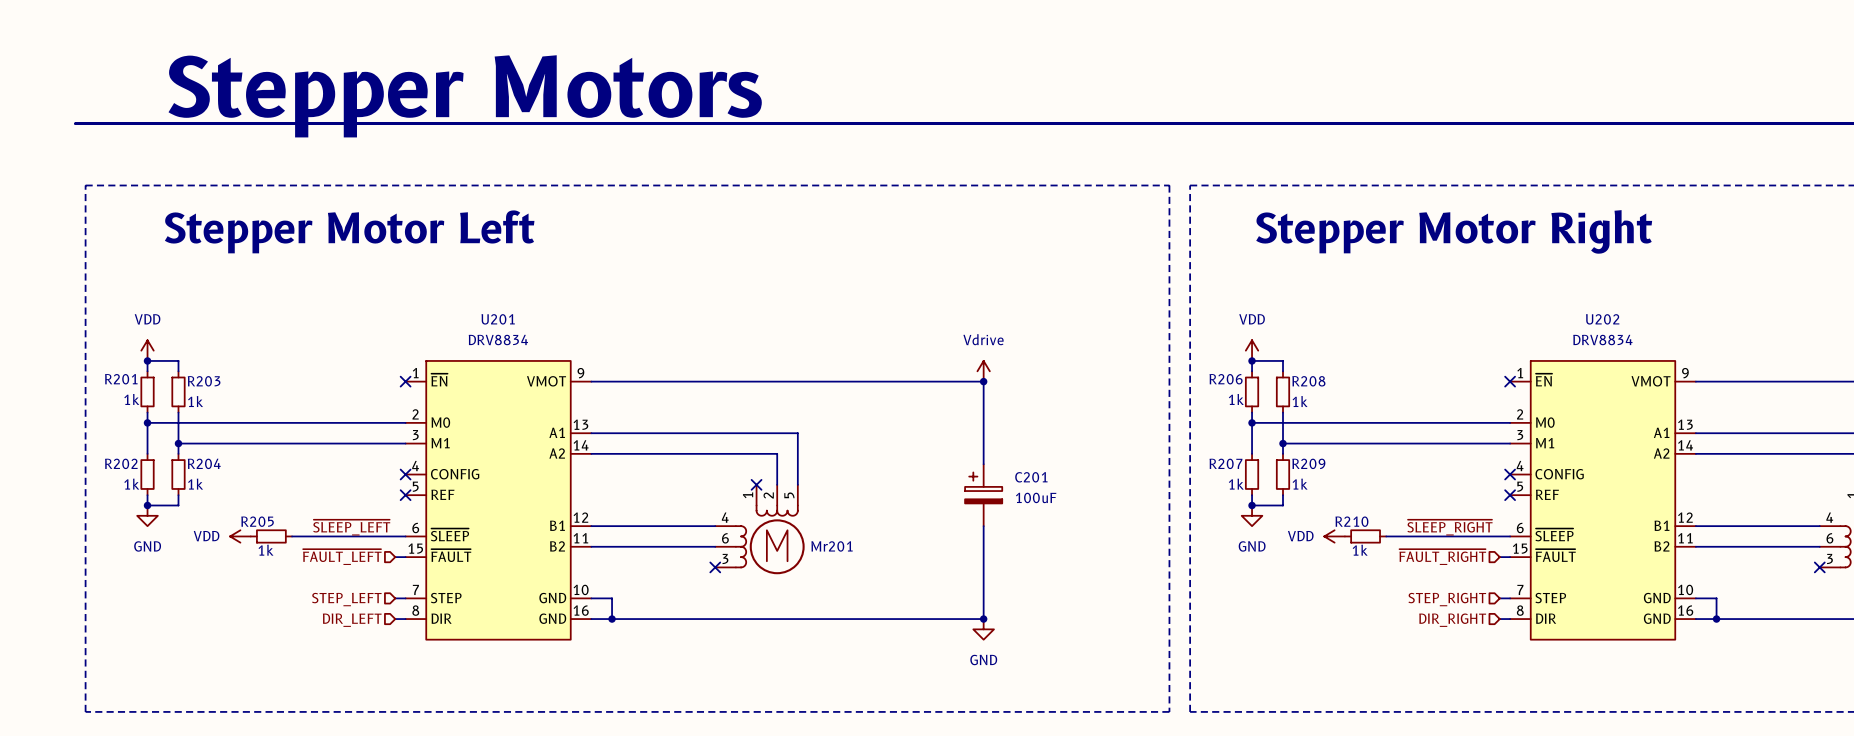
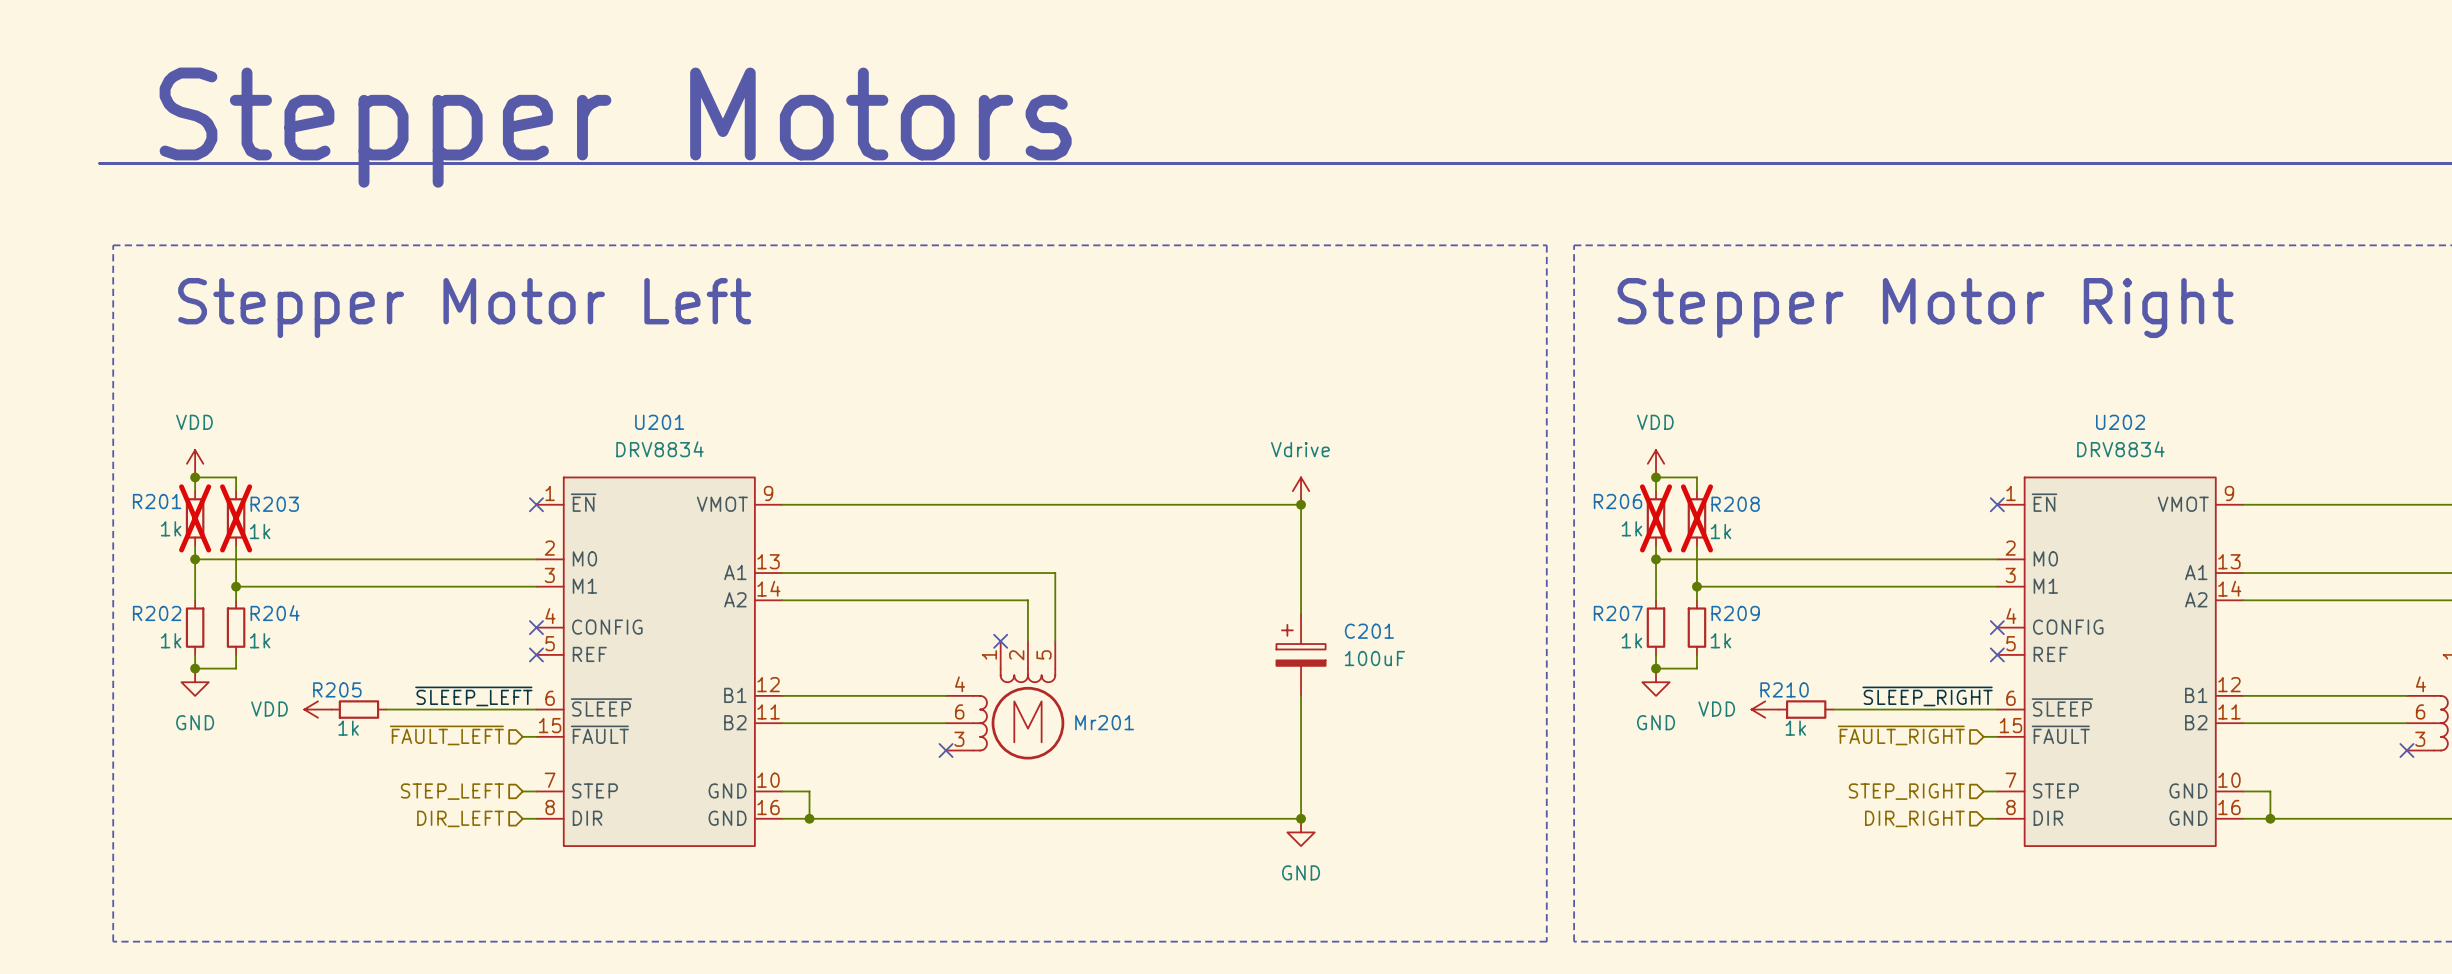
R201 do-not-place cross: none -> (195, 518)
R203 do-not-place cross: none -> (236, 518)
R206 do-not-place cross: none -> (1656, 518)
R208 do-not-place cross: none -> (1696, 518)

